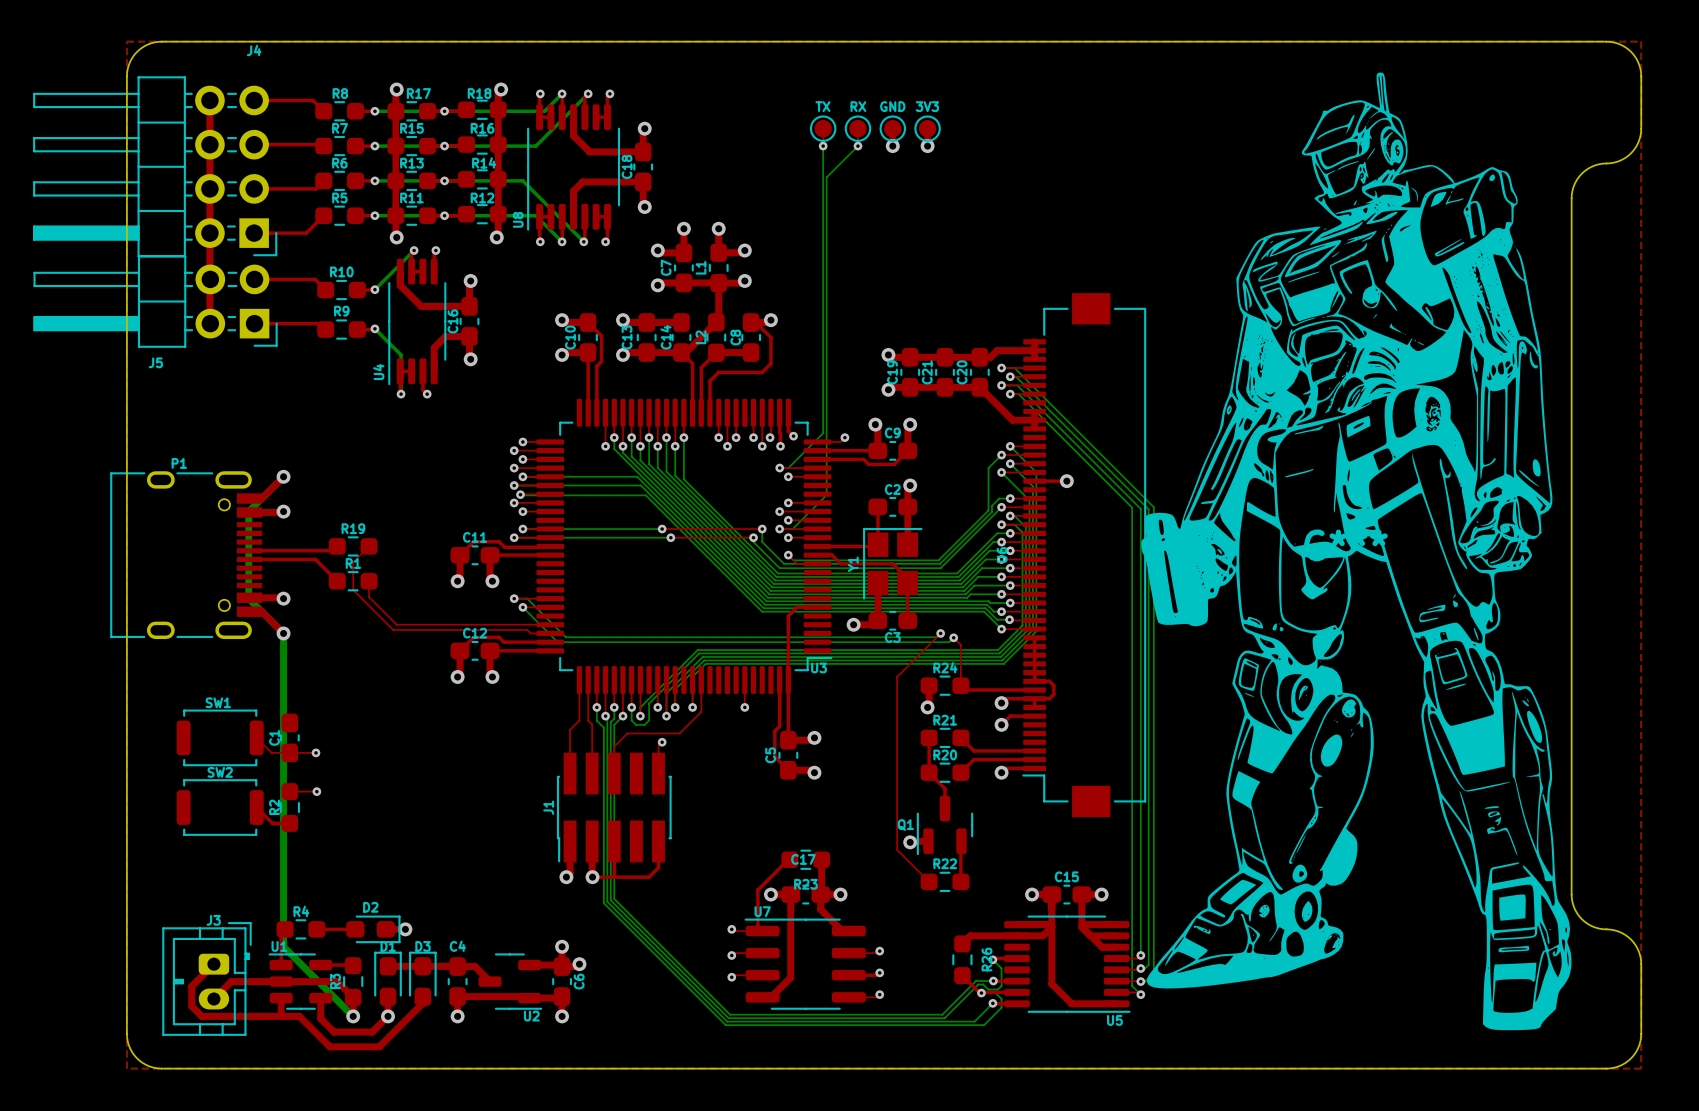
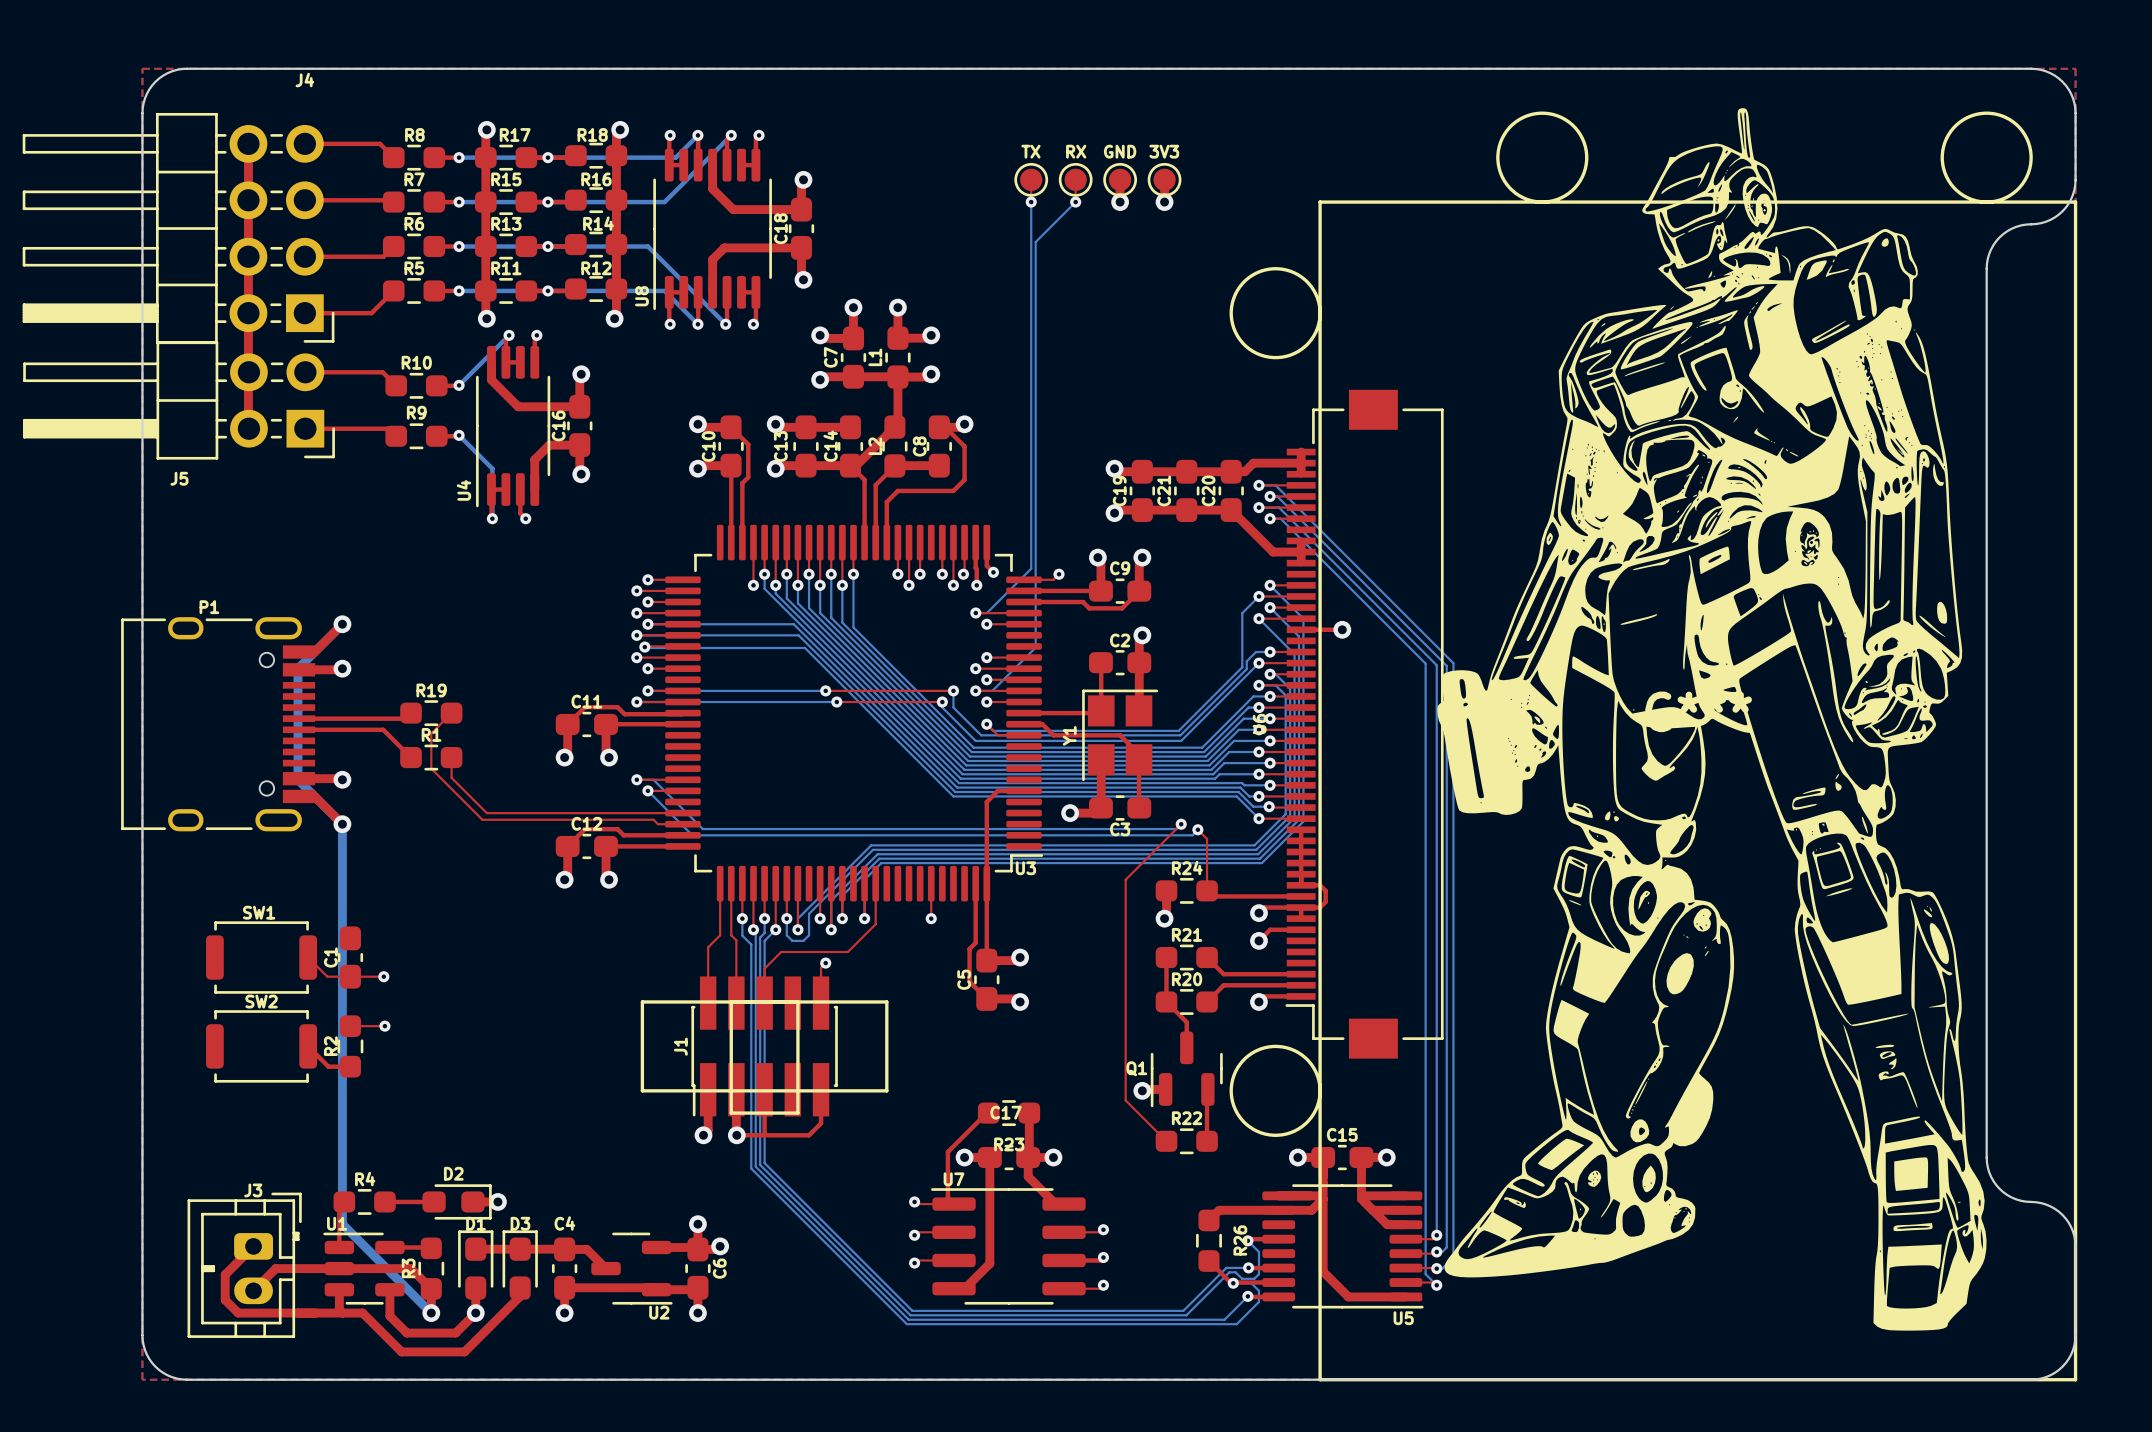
drawing: none -> [1496, 111, 1589, 204]
drawing: none -> [1940, 111, 2033, 204]
line: none -> (1320, 202) (2075, 202) (2075, 1379) (1320, 1379) (1320, 202)
drawing: none -> [1229, 267, 1322, 360]
line: none -> (642, 1001) (886, 1001) (886, 1090) (642, 1090) (642, 1001)
line: none -> (731, 1001) (731, 1113) (797, 1113) (797, 1001)
drawing: none -> [1229, 1044, 1322, 1137]

